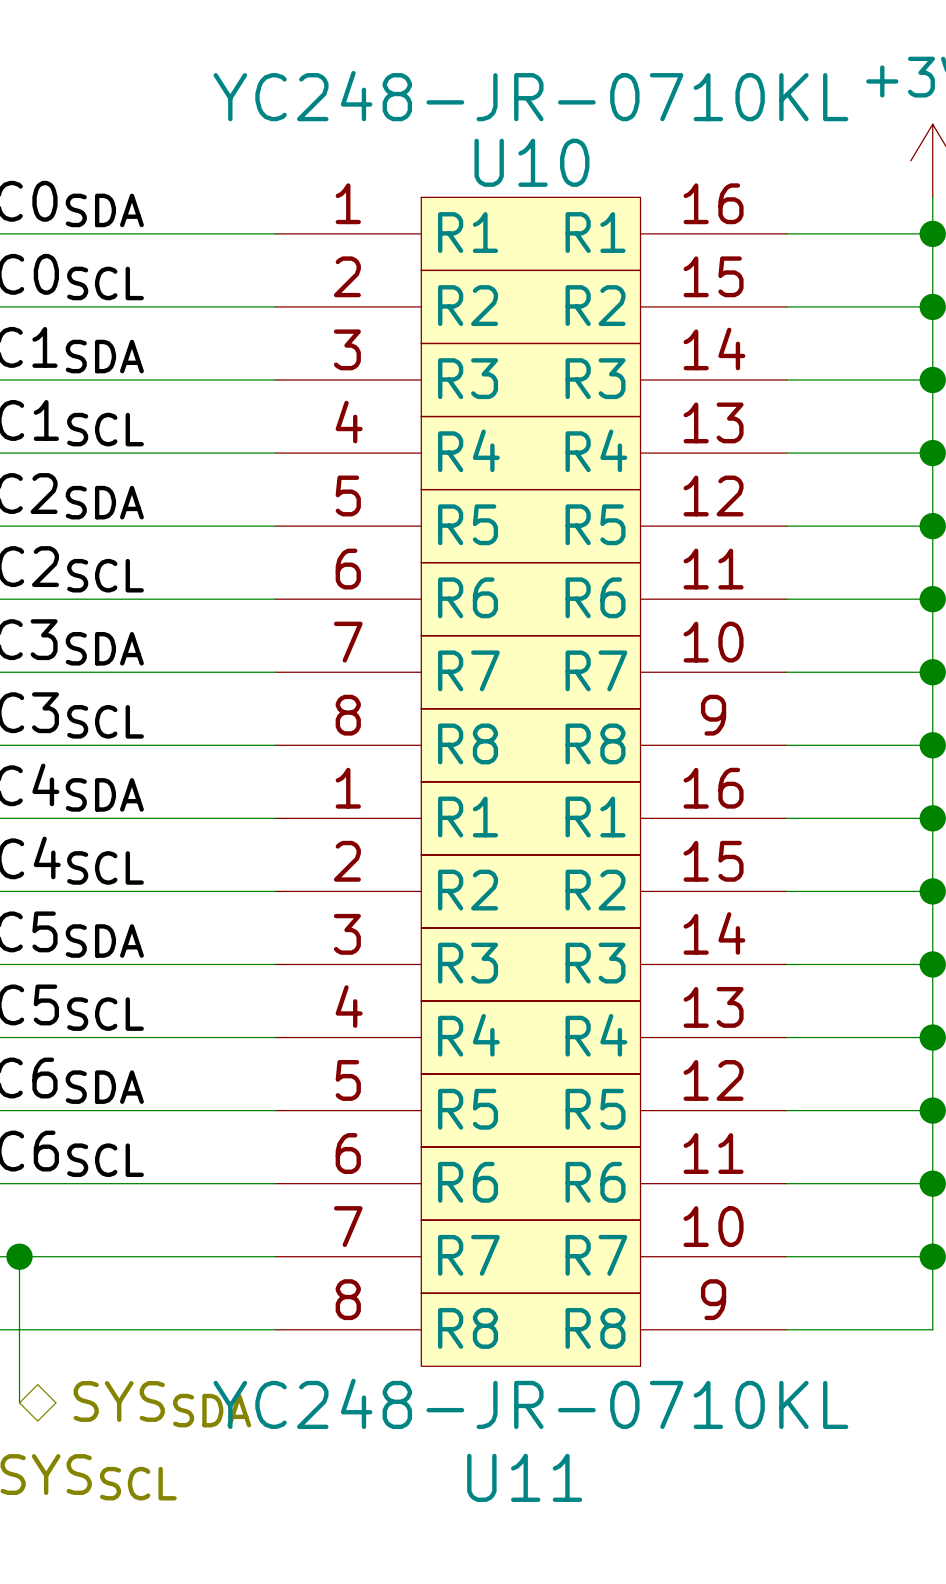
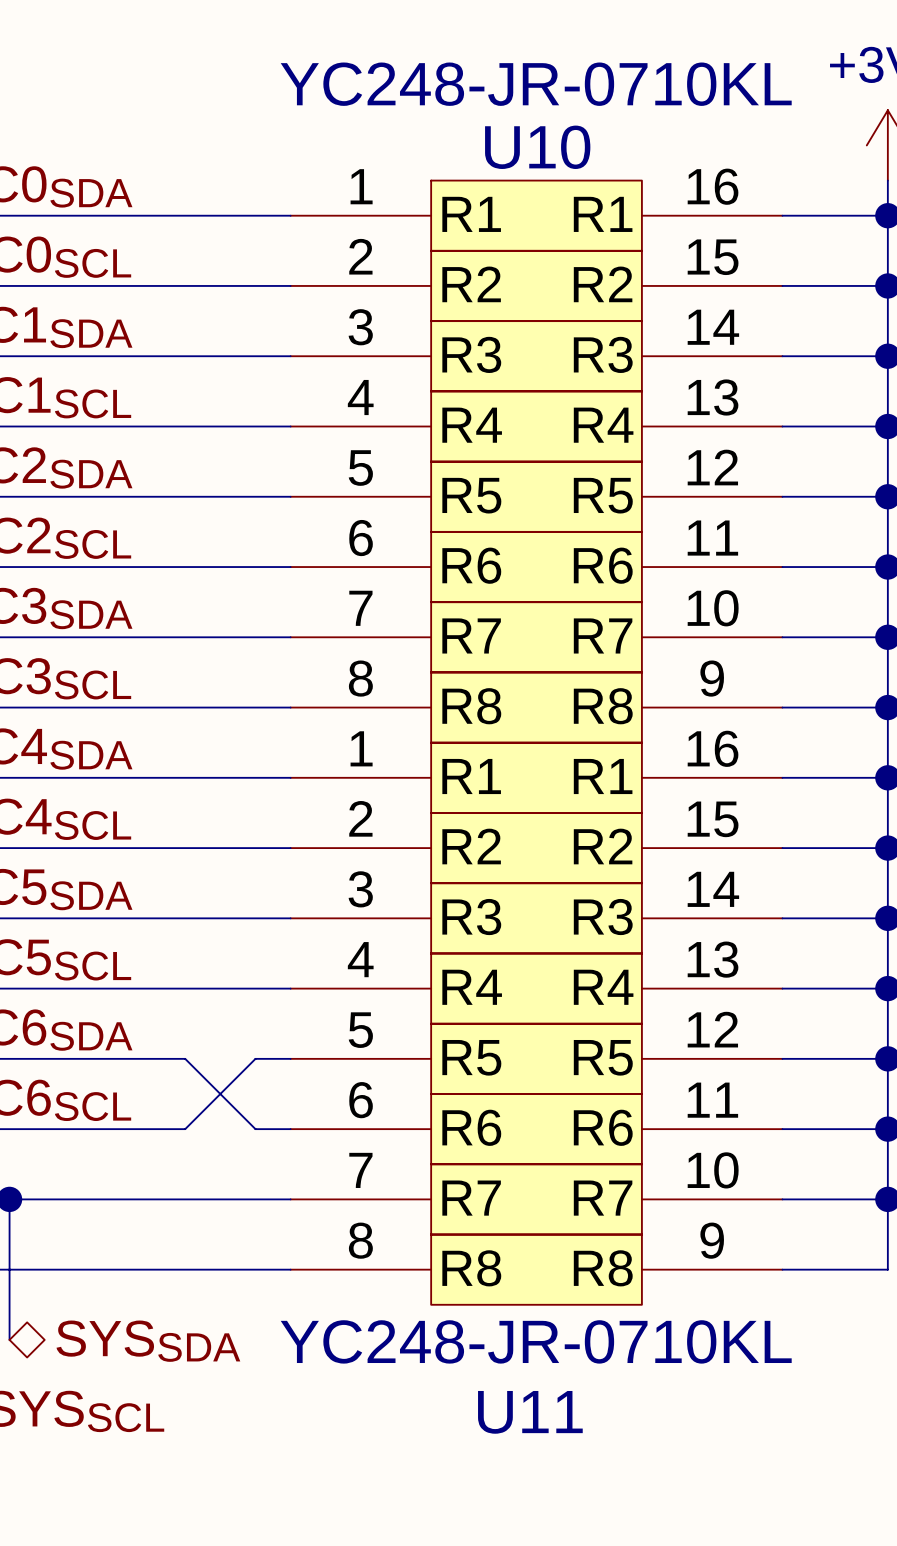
U10 position: (530, 489) -> (536, 461)
U11 position: (530, 1074) -> (536, 1023)
wire: (202, 1110) (275, 1110) -> (185, 1058) (255, 1129) (290, 1129)
wire: (202, 1183) (275, 1183) -> (185, 1129) (255, 1058) (290, 1058)

